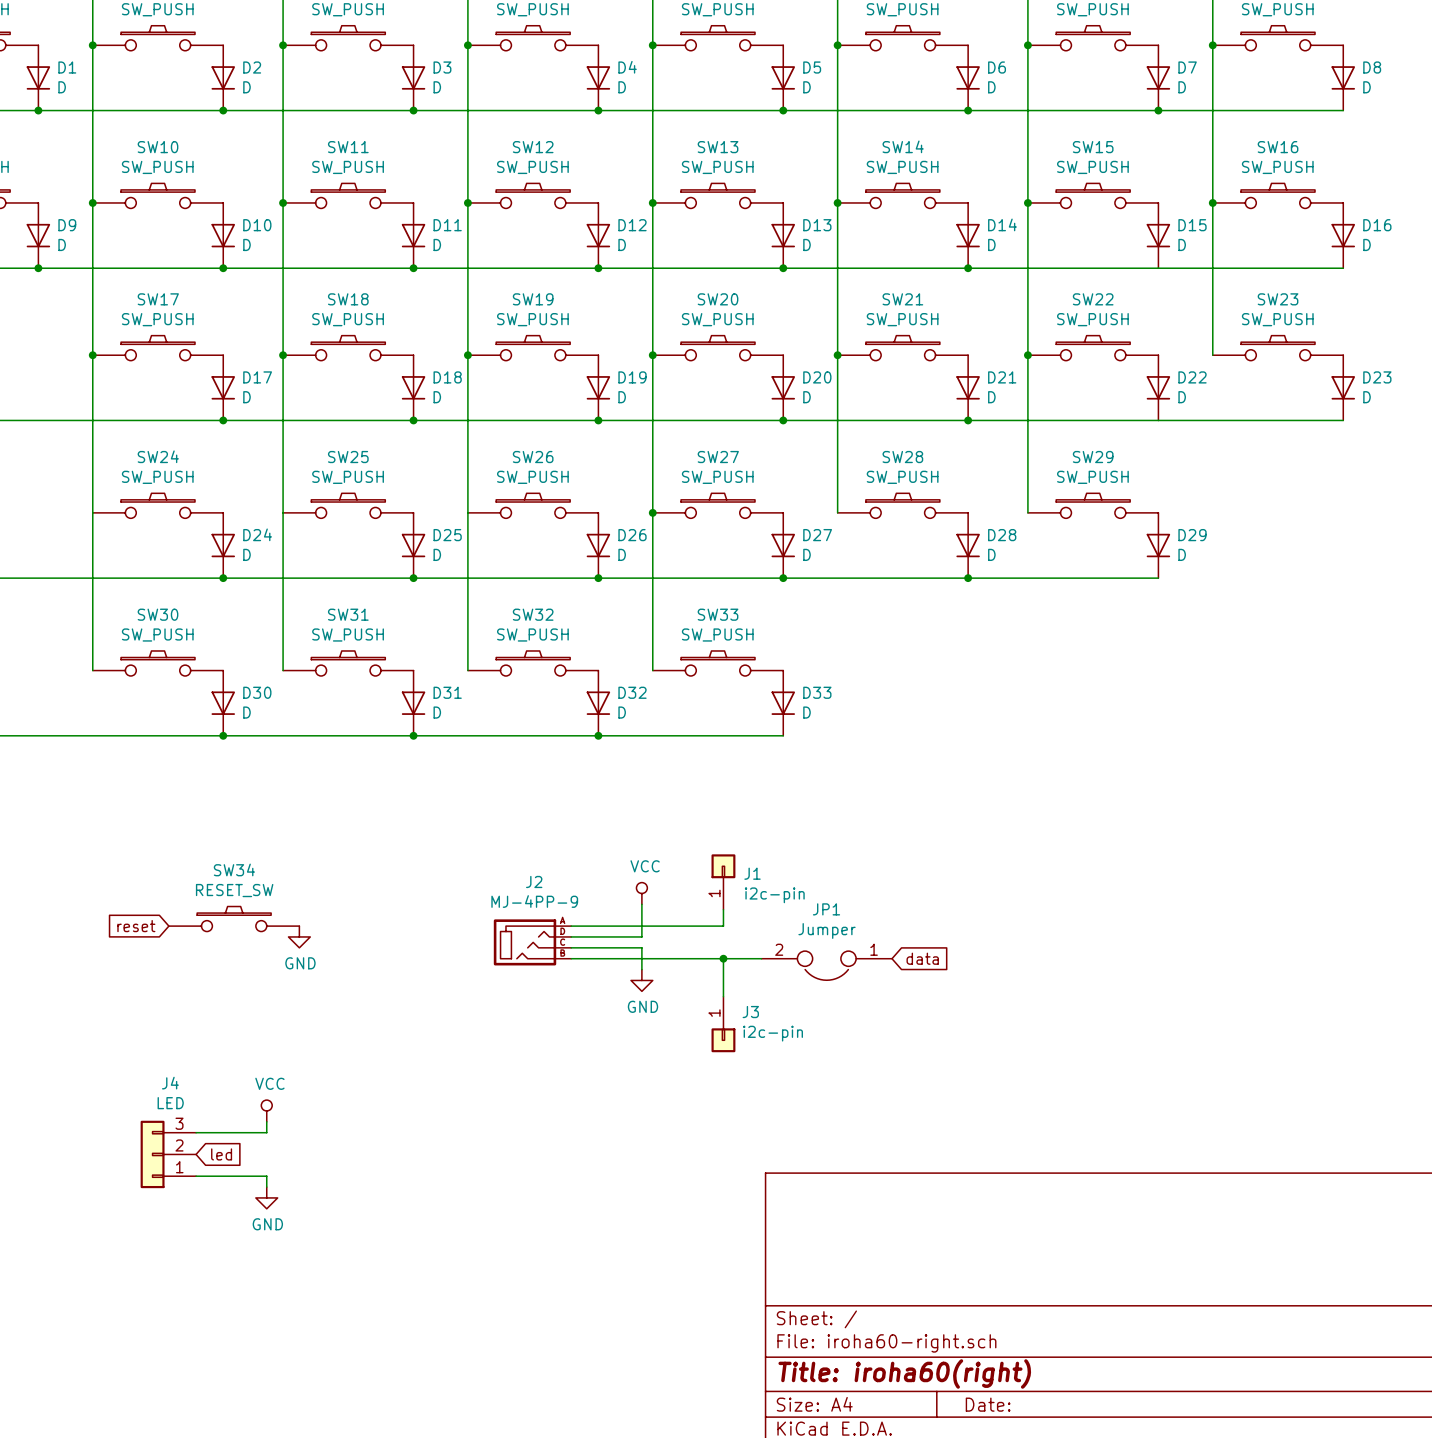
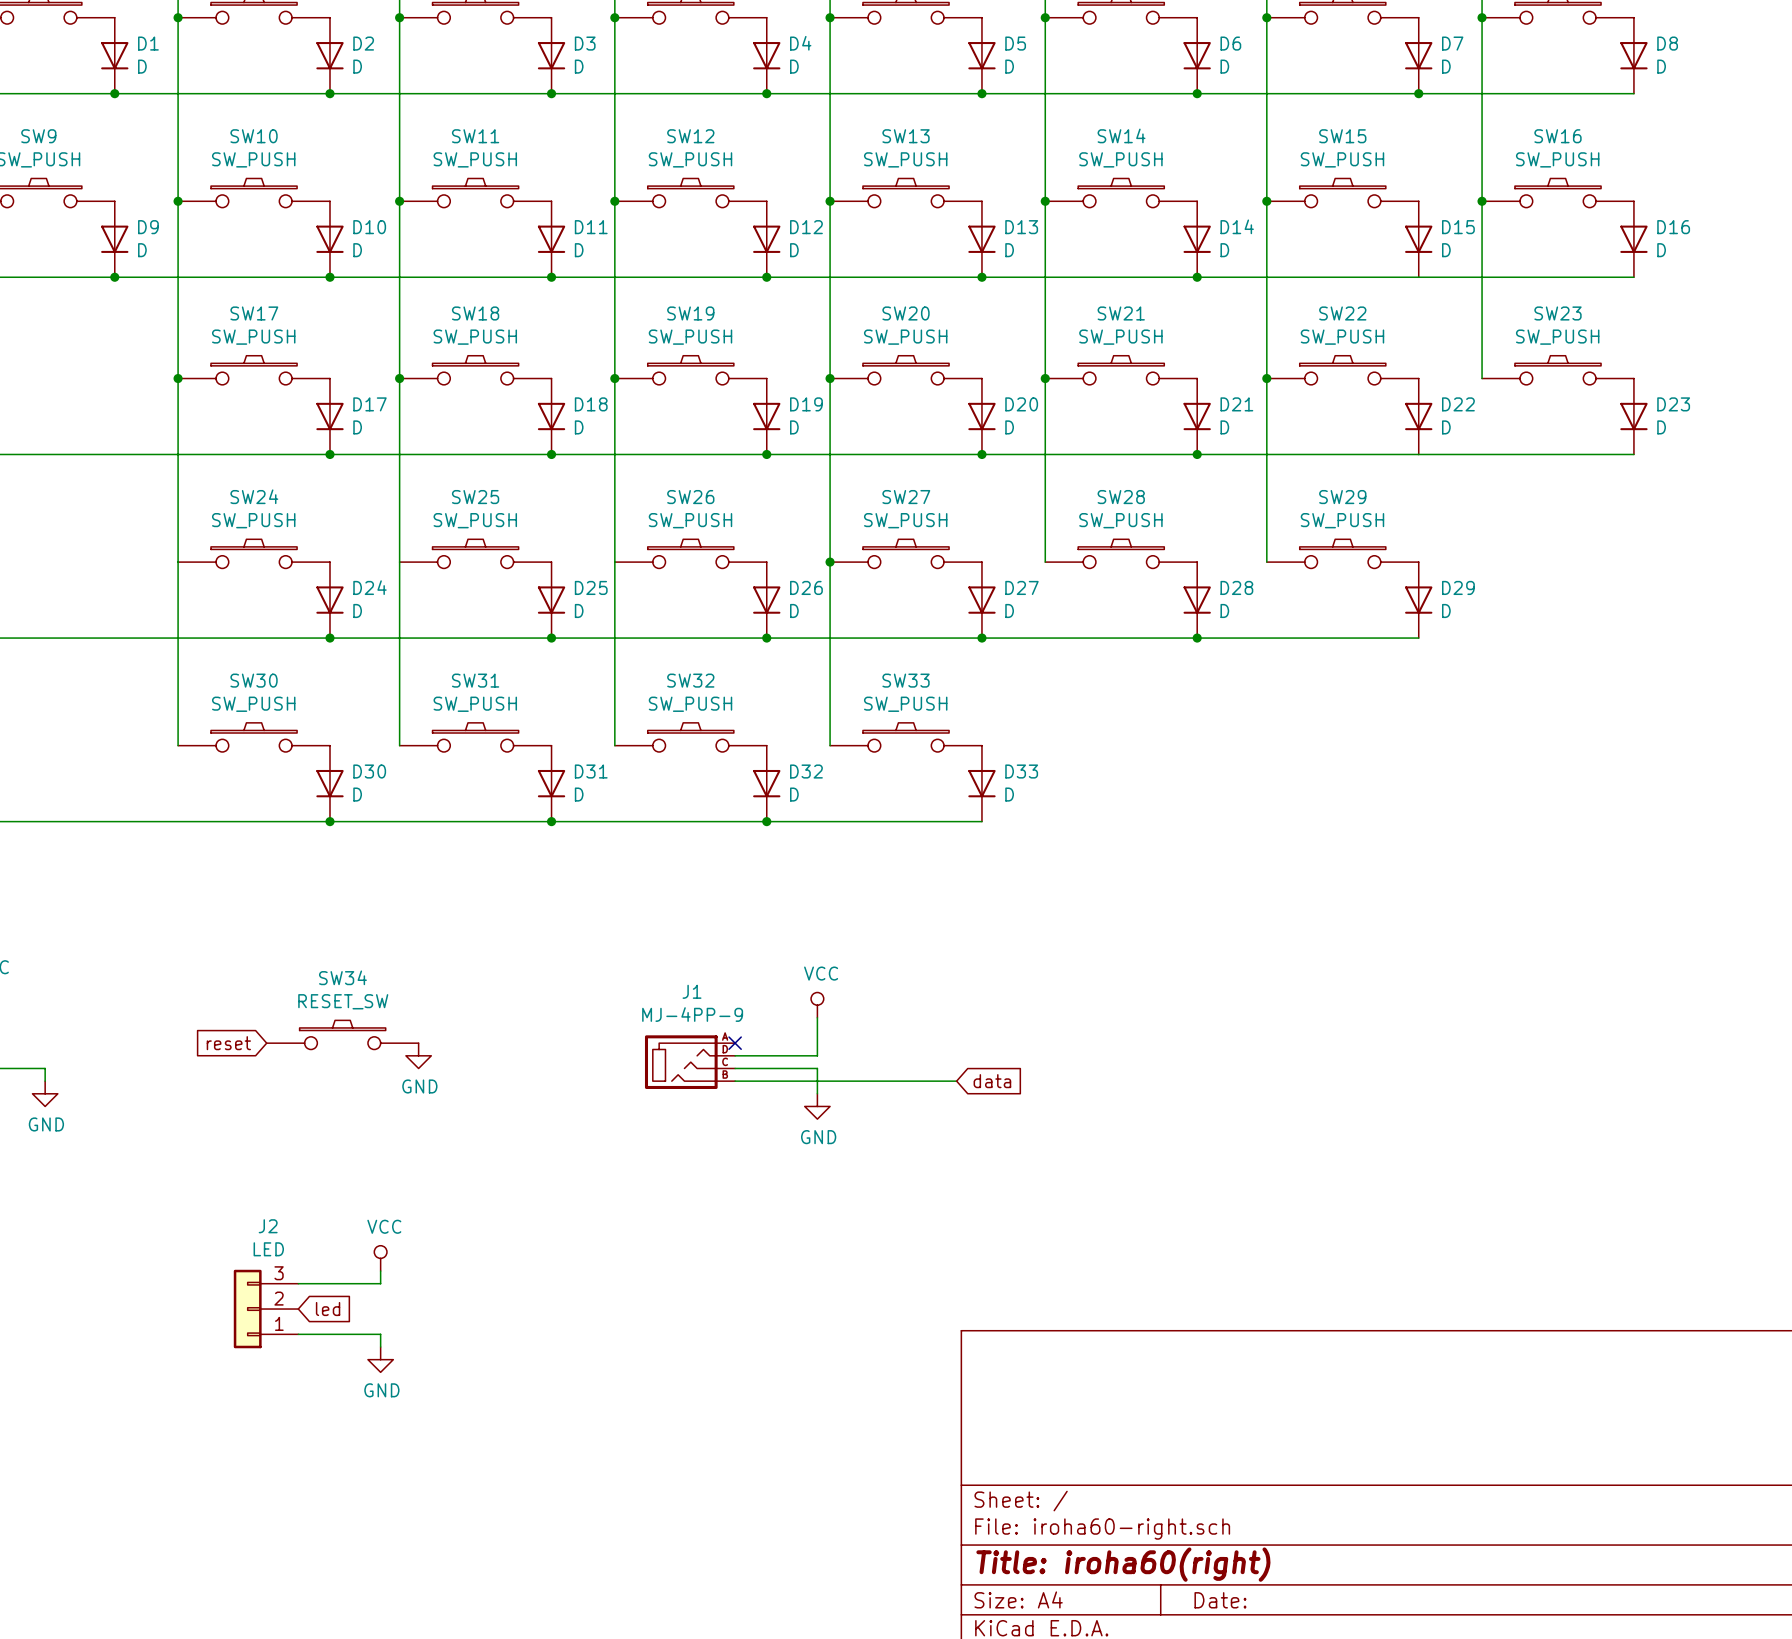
J2 name: J2 (534, 881) -> J1 (692, 991)
J1: i2c-pin (723, 882) -> none
wire: (723, 909) (723, 926) (571, 926) -> none
no-connect mark: none -> (735, 1043)
wire: (723, 958) (723, 996) -> none
junction: (723, 958) -> none
global label position: data (922, 958) -> data (992, 1081)
JP1: Jumper (826, 965) -> none
J3: i2c-pin (723, 1024) -> none
J4 name: J4 (170, 1083) -> J2 (268, 1226)

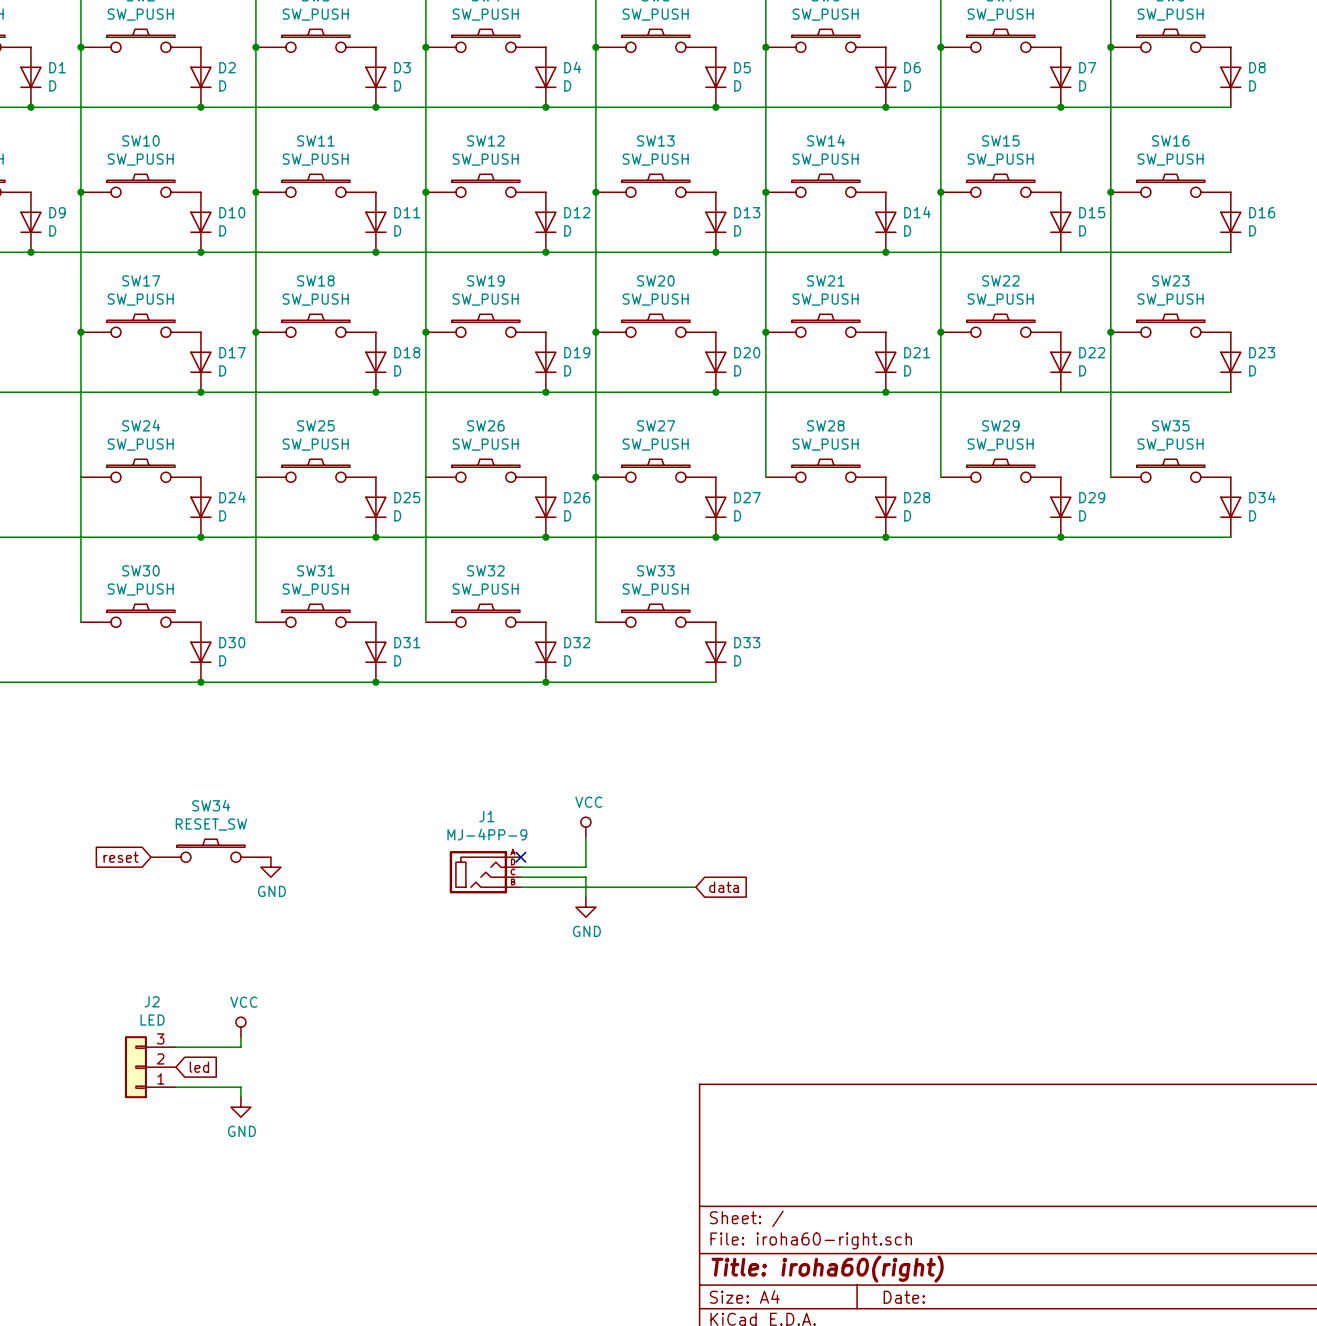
wire: none -> (1110, 332) (1110, 477)
junction: none -> (1110, 332)
SW35: none -> SW_PUSH (1170, 470)
D34: none -> D (1230, 507)
wire: none -> (1060, 537) (1230, 537)
junction: none -> (1060, 537)

